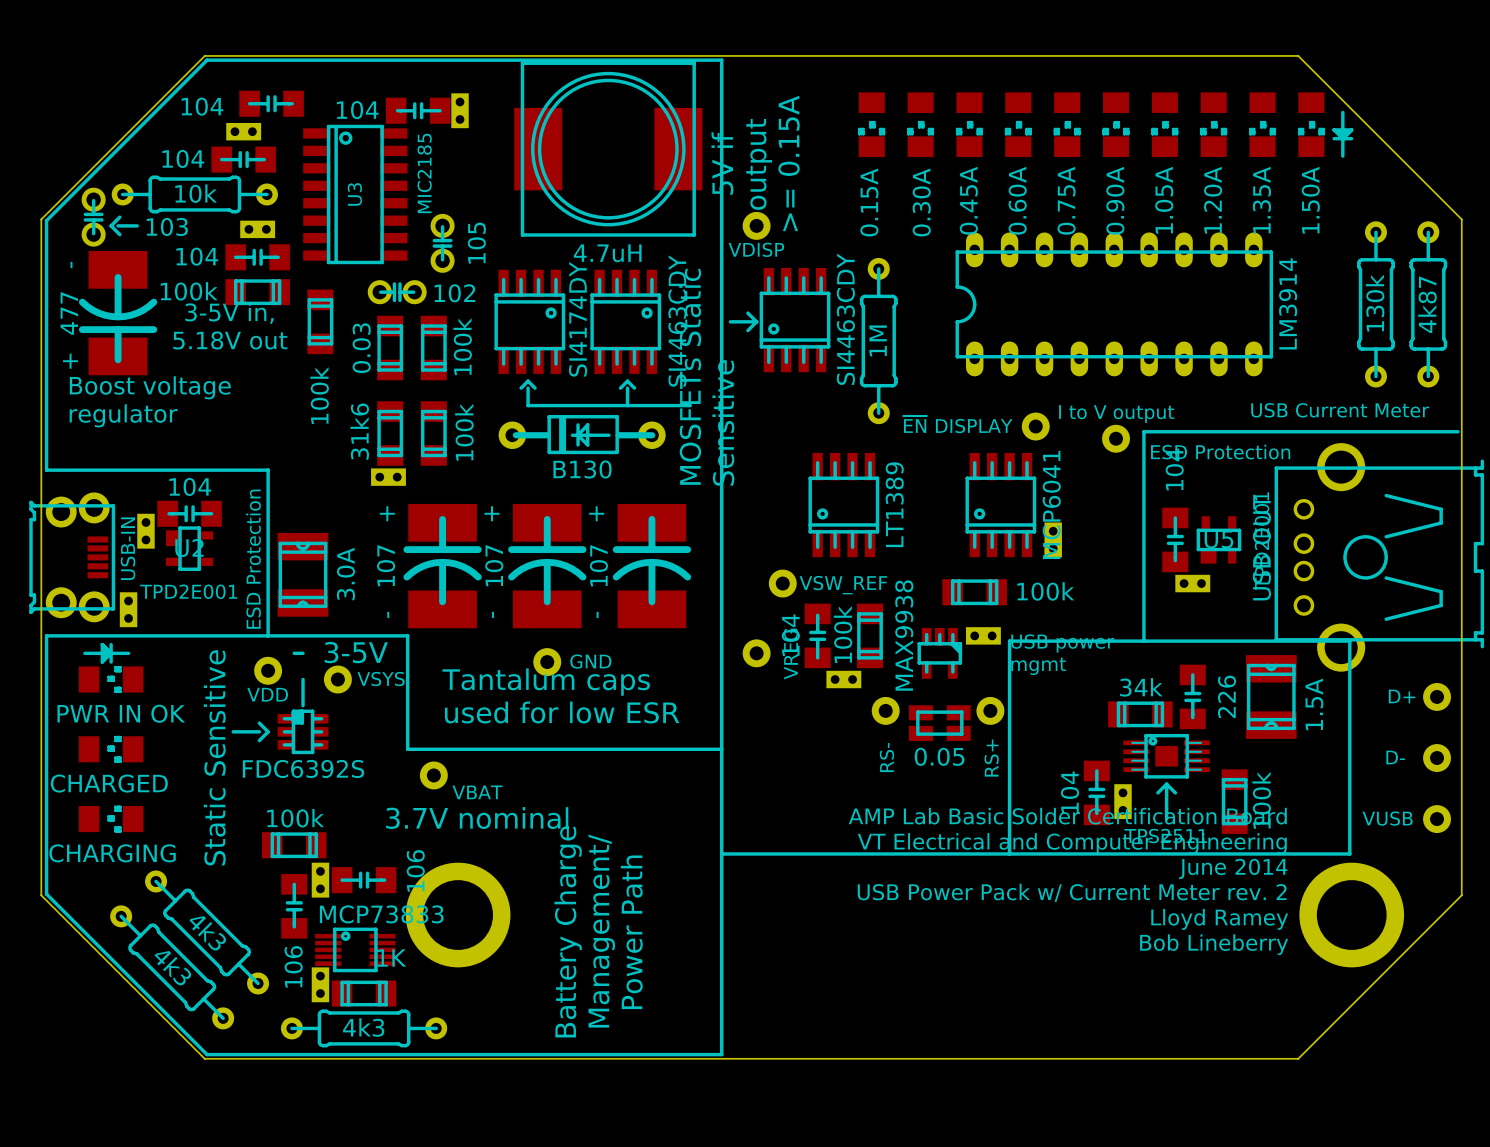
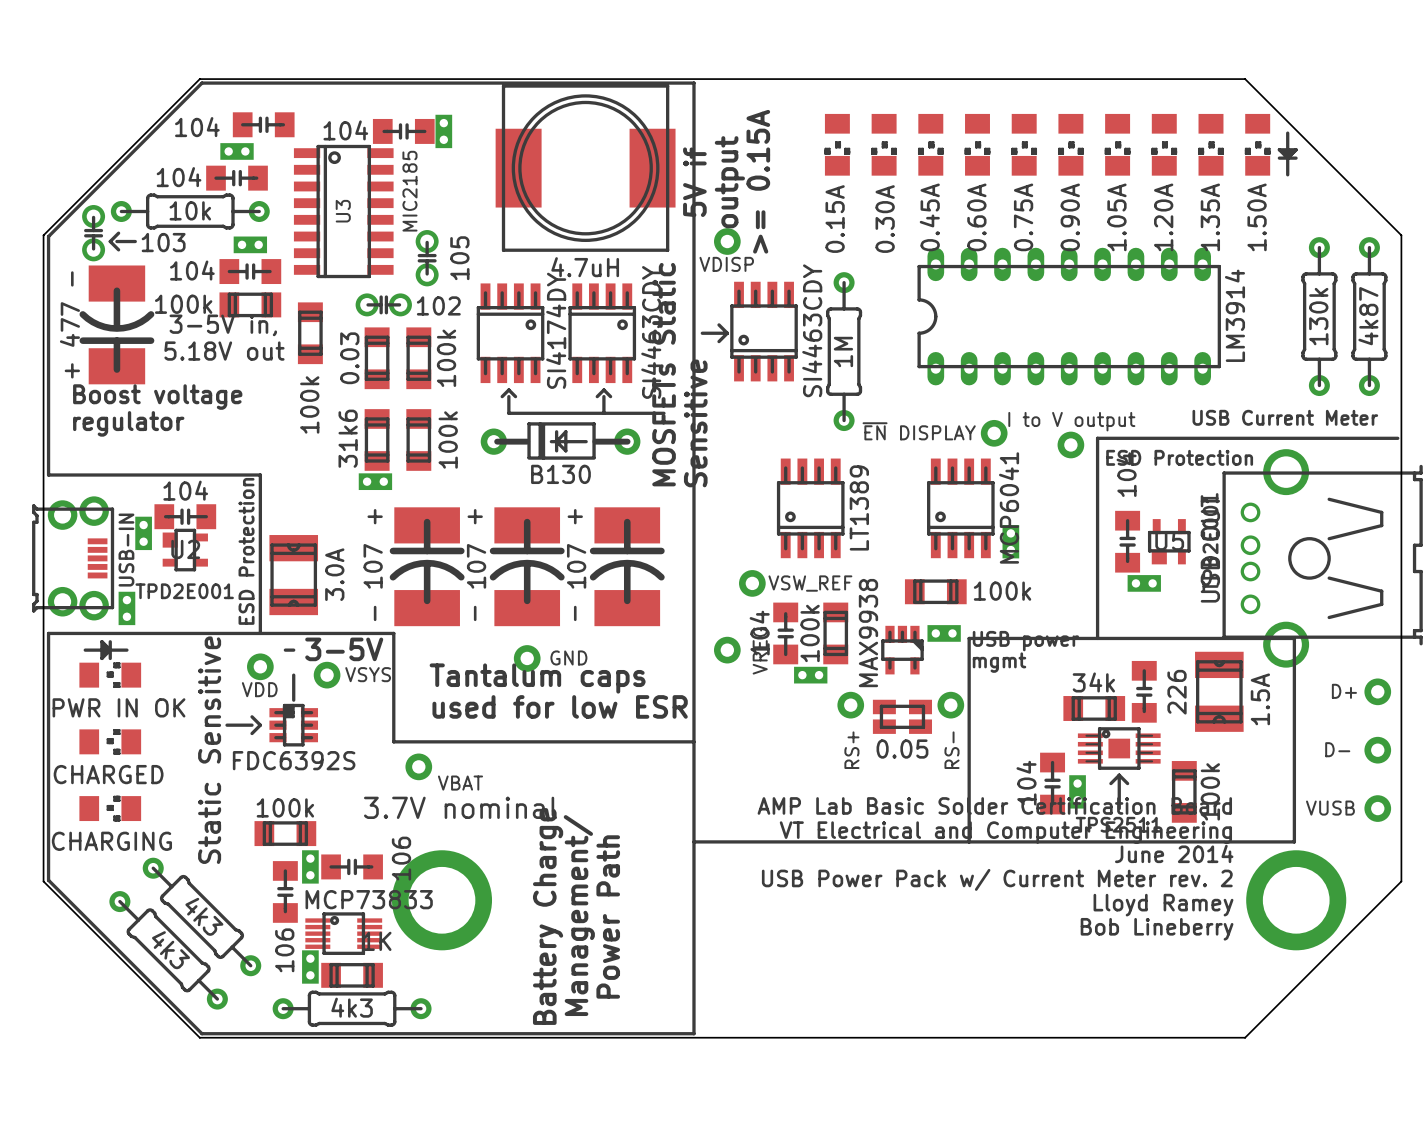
part value: RS- (886, 757) -> RS+ (851, 750)
part value: RS+ (991, 758) -> RS- (951, 750)

